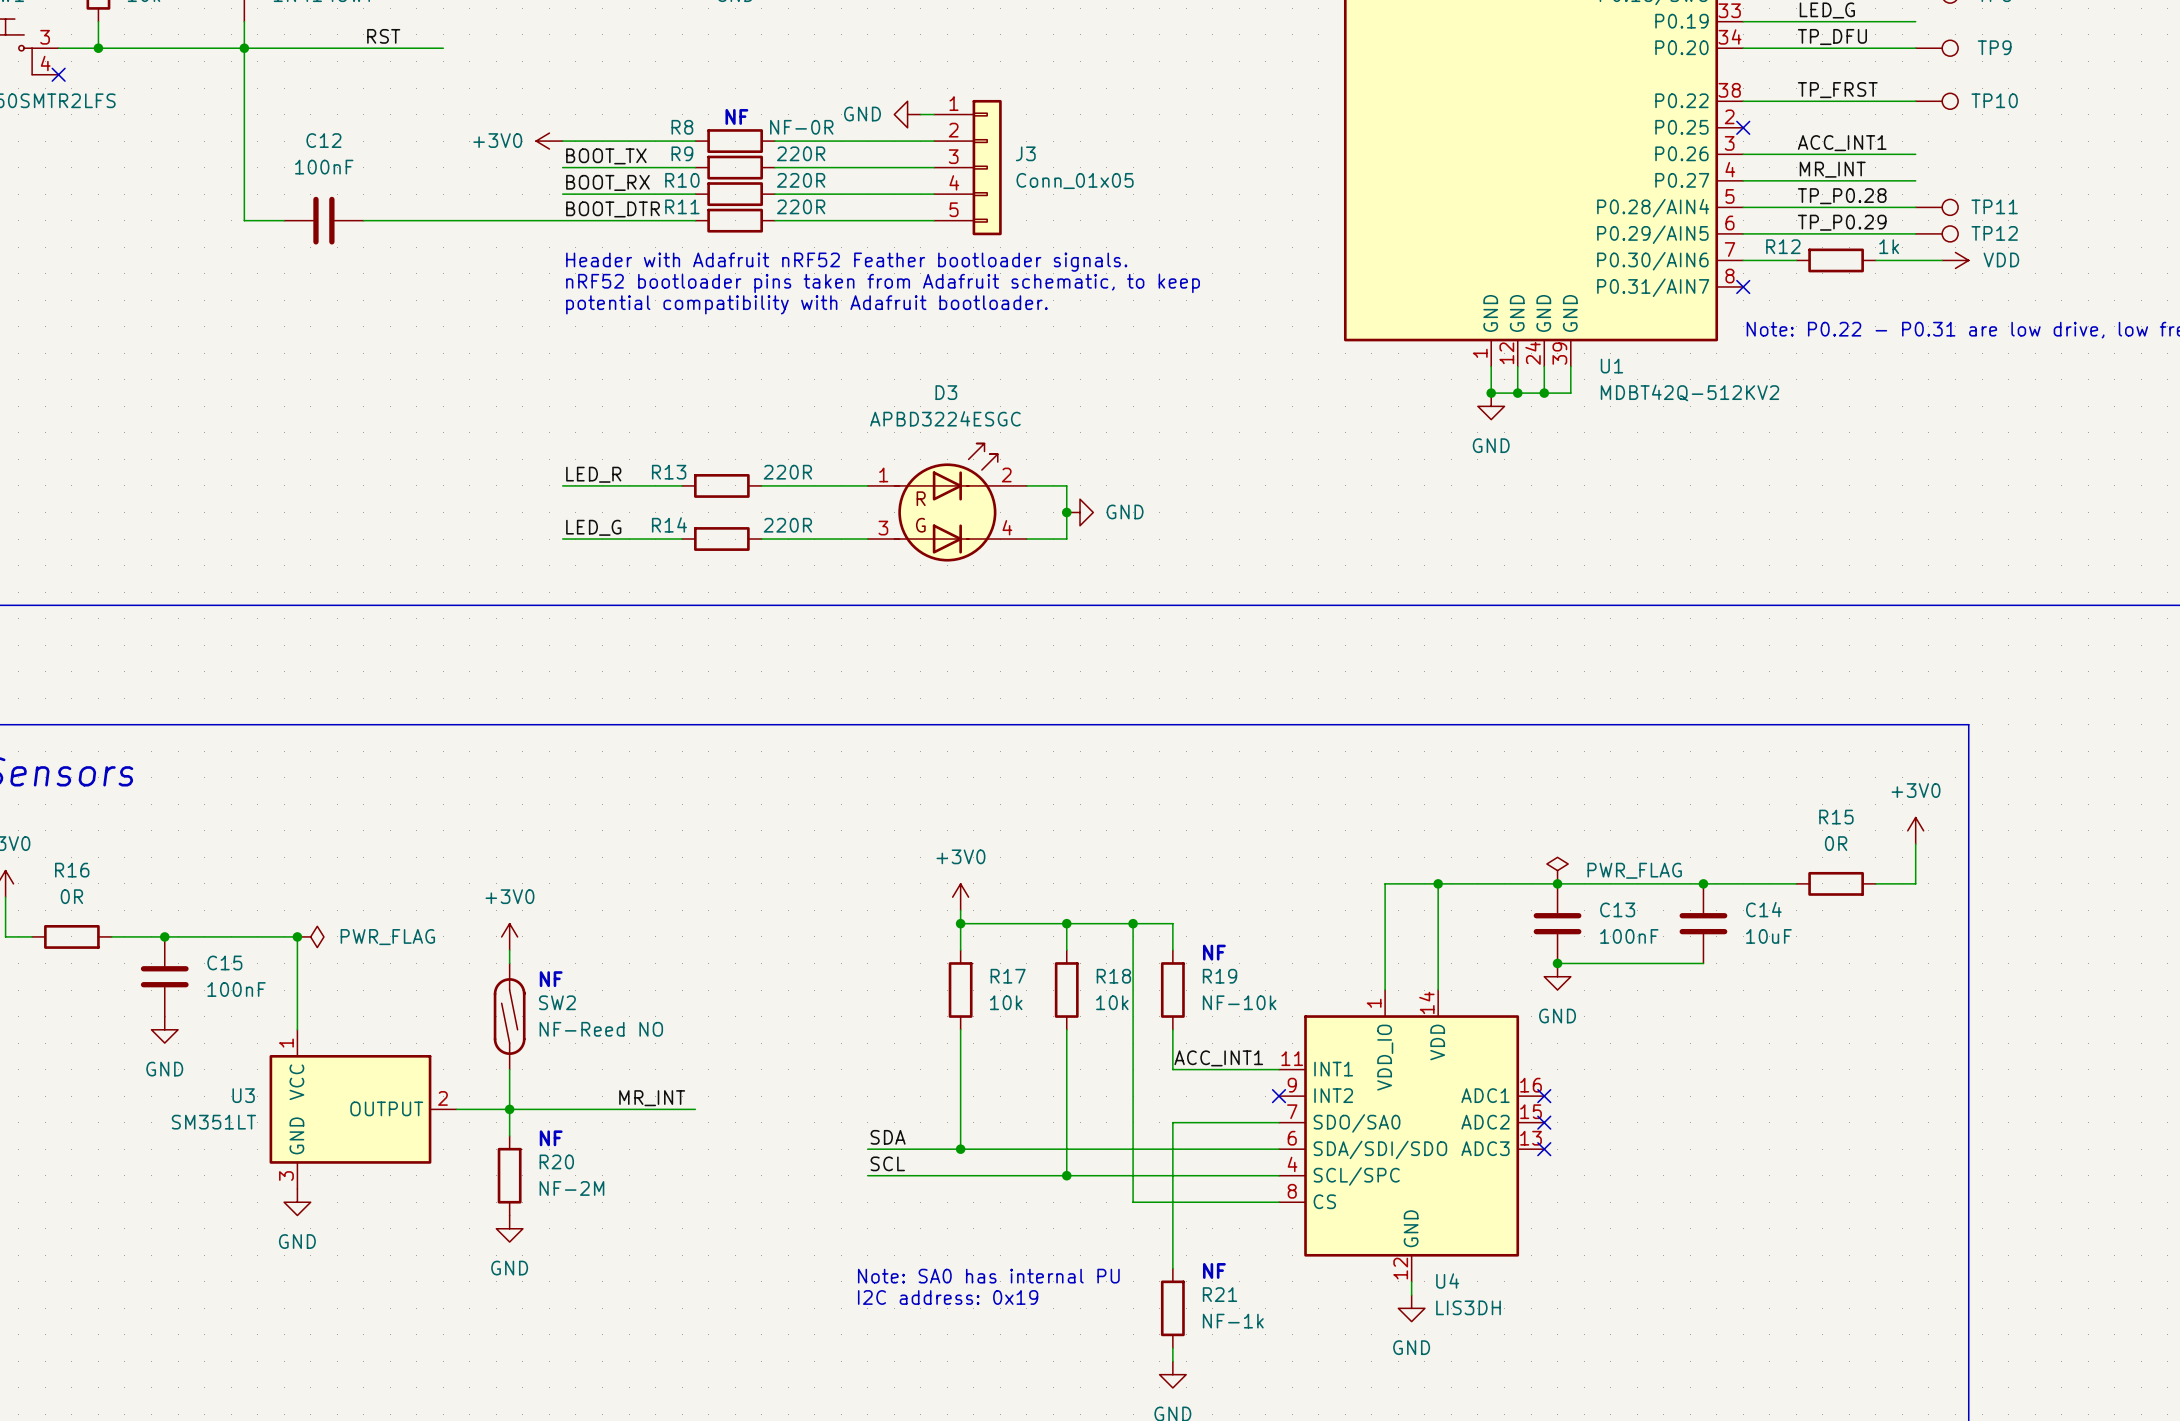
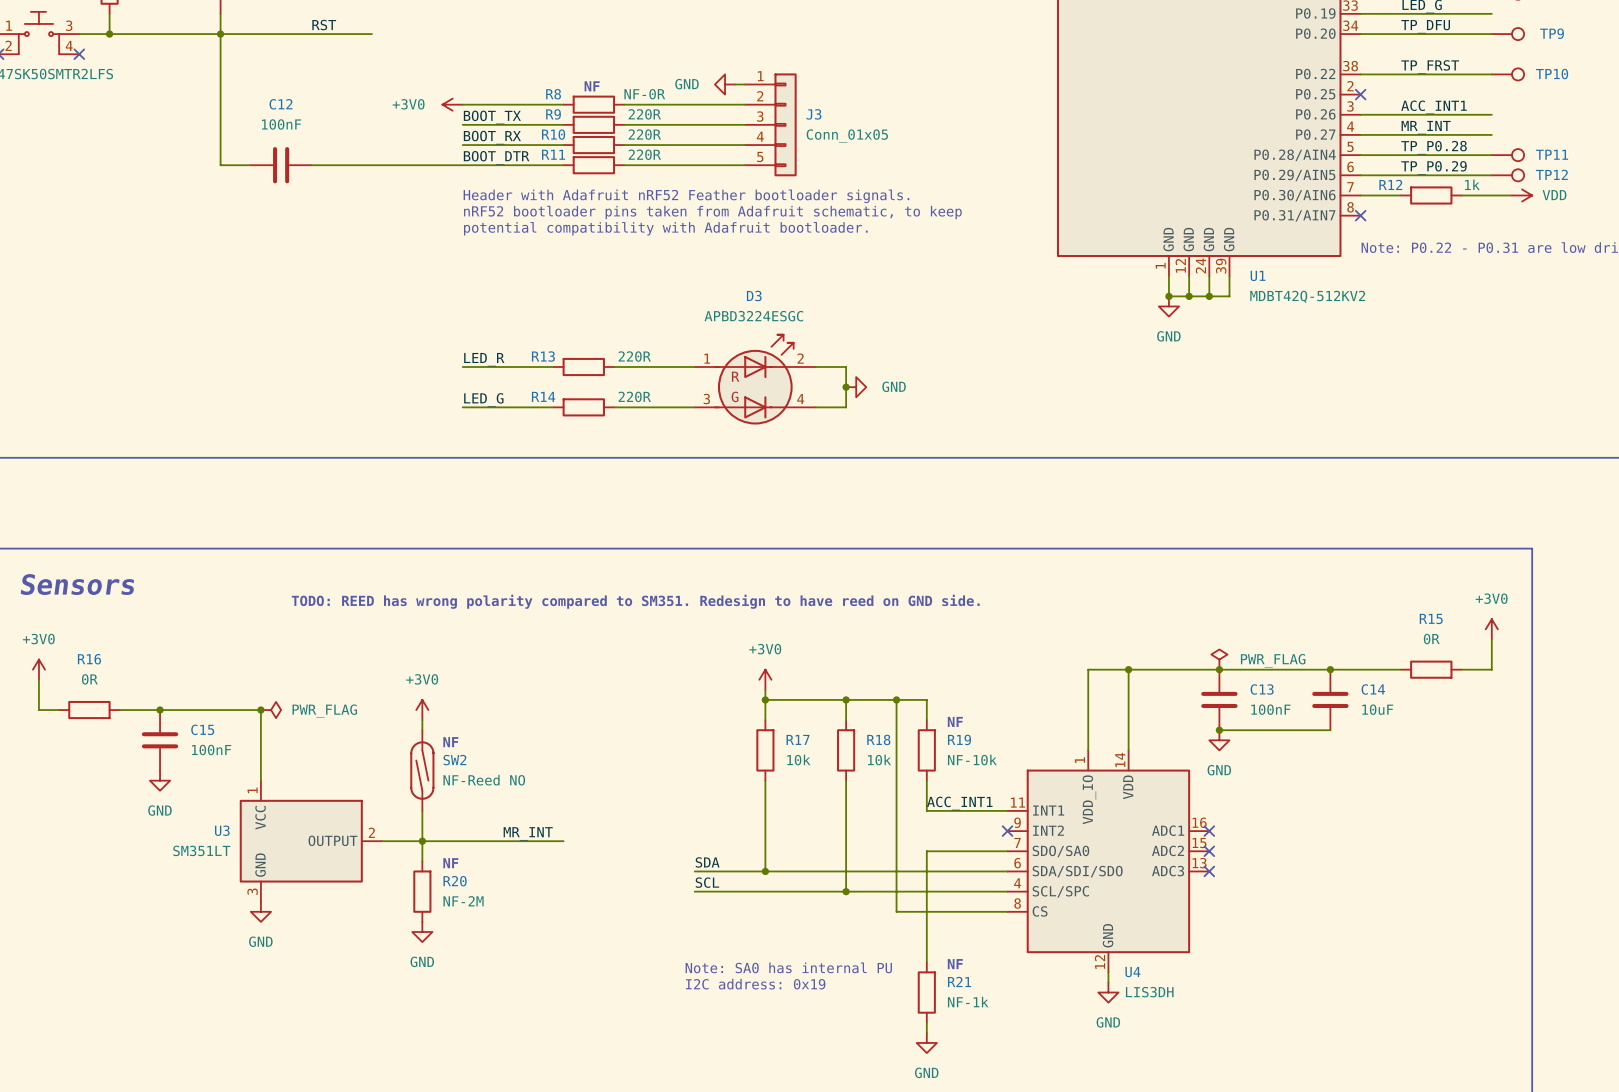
text: none -> TODO: REED has wrong polarity compared to SM351. Redesign to have reed on GND side. (635, 601)

